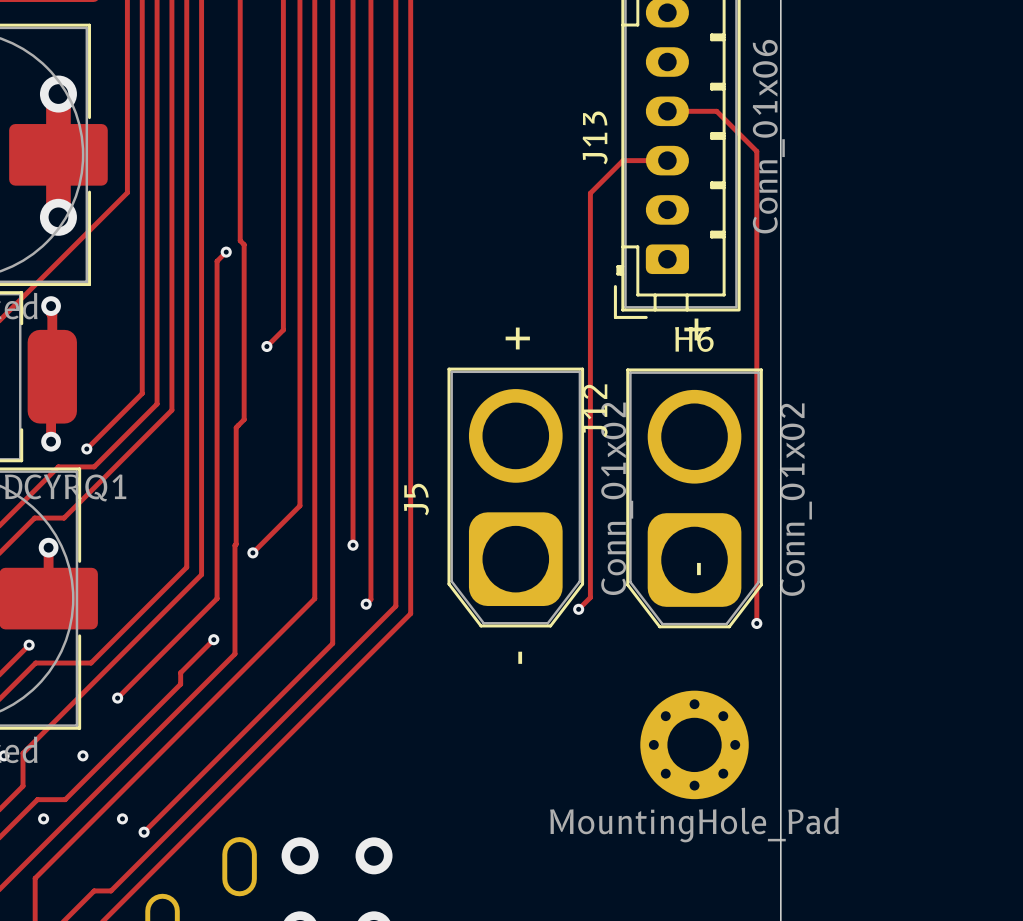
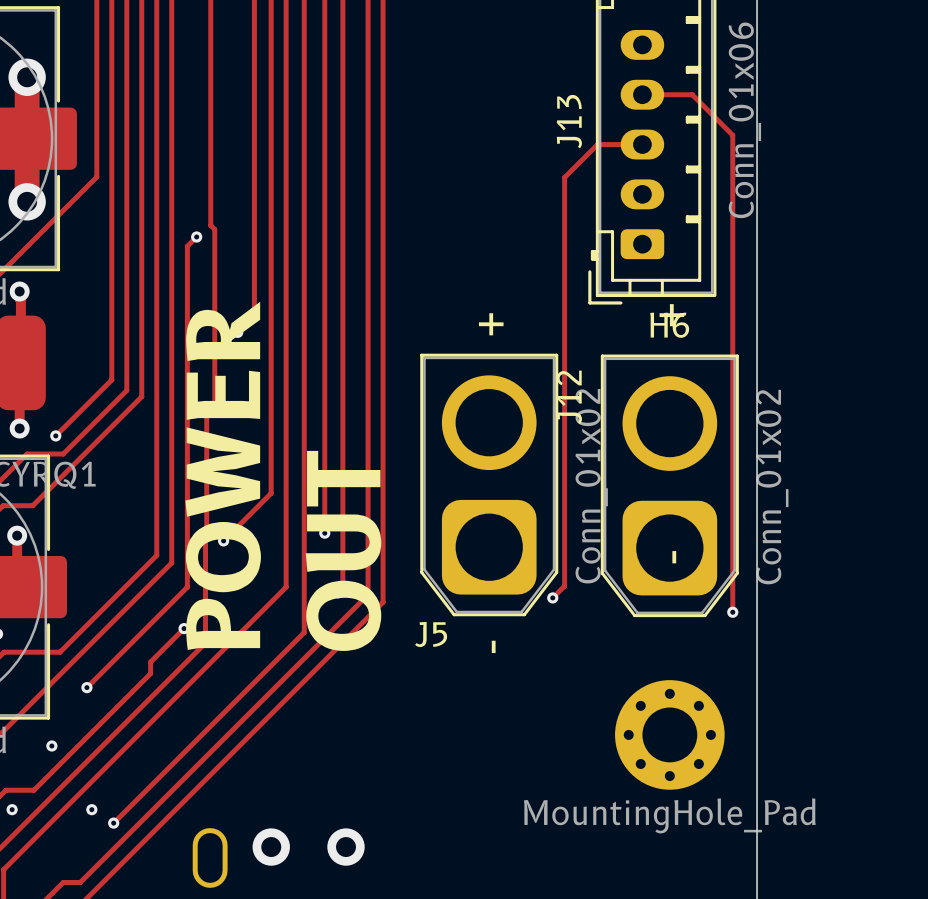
text: none -> POWER (223, 475)
J5 name rotation: 0° (416, 499) -> 90° clockwise (431, 634)
J5 name position: J5 (416, 499) -> J5 (431, 634)
text: none -> OUT (343, 550)

